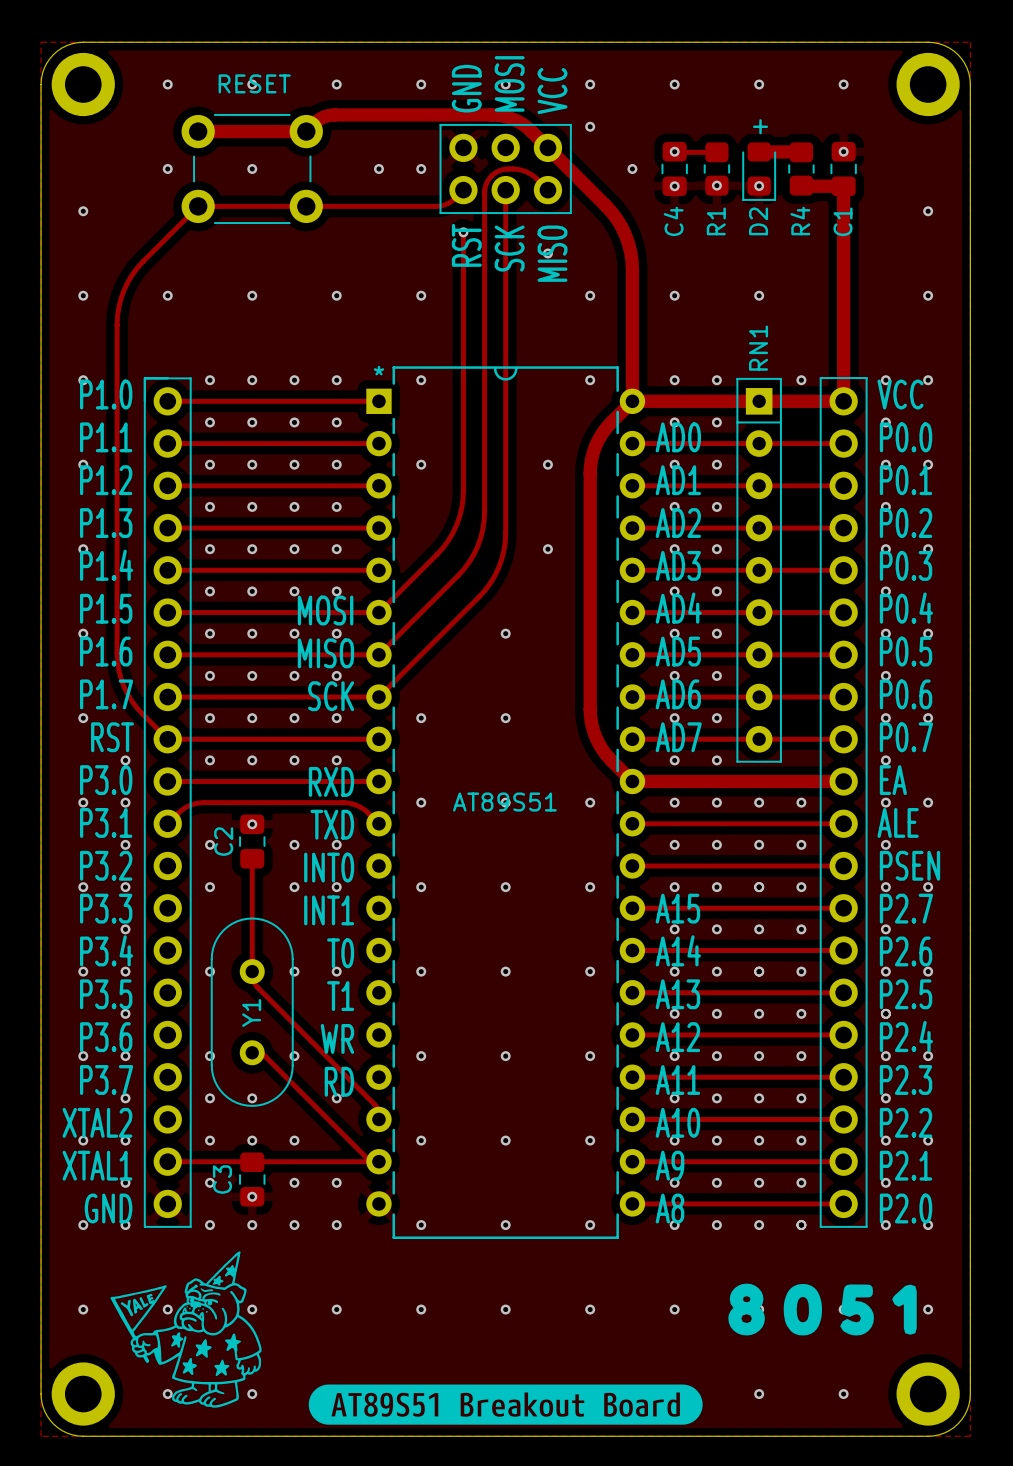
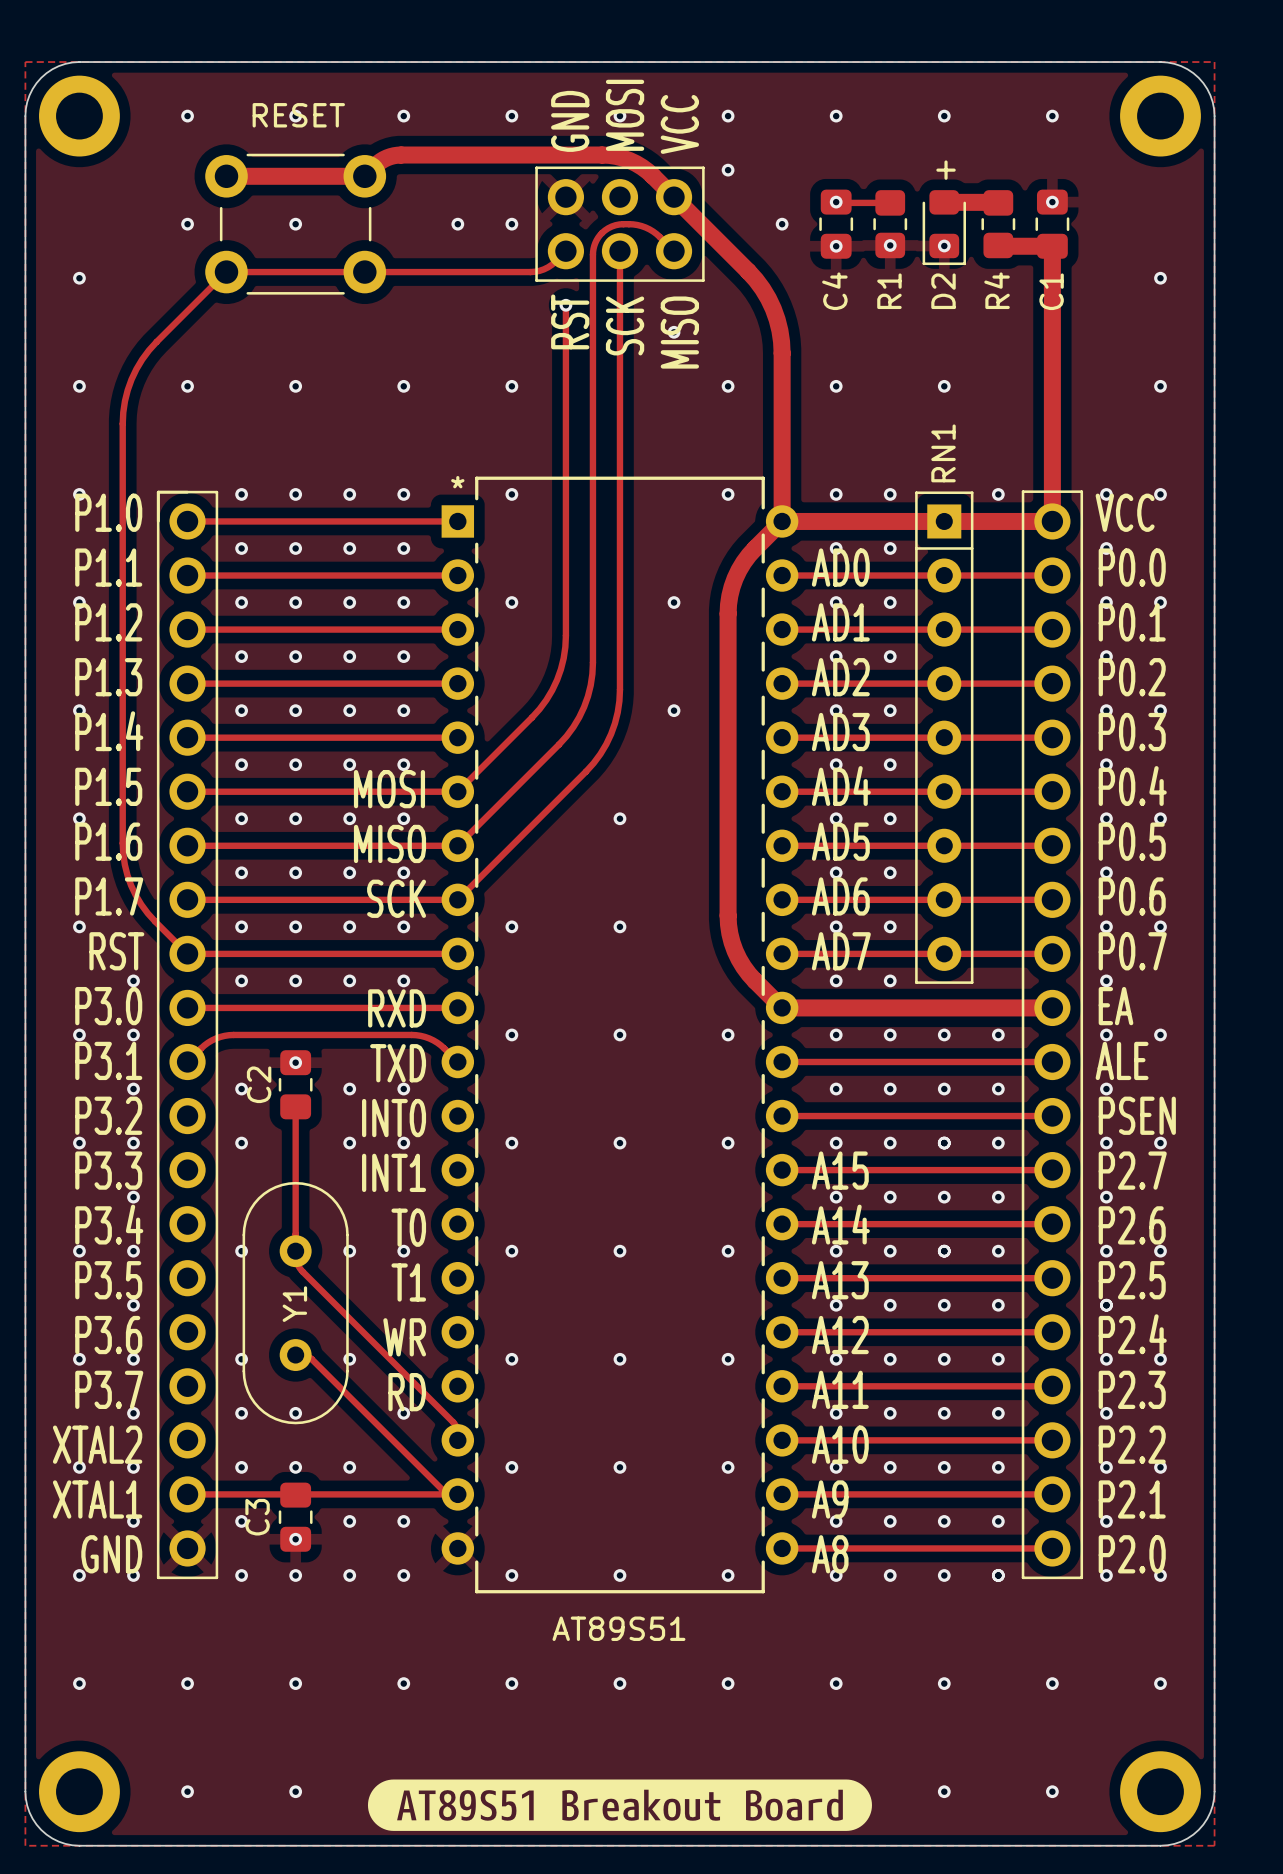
part footprint: [366, 366, 646, 1240] -> [441, 476, 799, 1594]
text: AT89S51 (504, 802) -> none
drawing: [110, 1251, 262, 1408] -> none
text: none -> AT89S51 (618, 1628)
drawing: [728, 1283, 917, 1336] -> none

